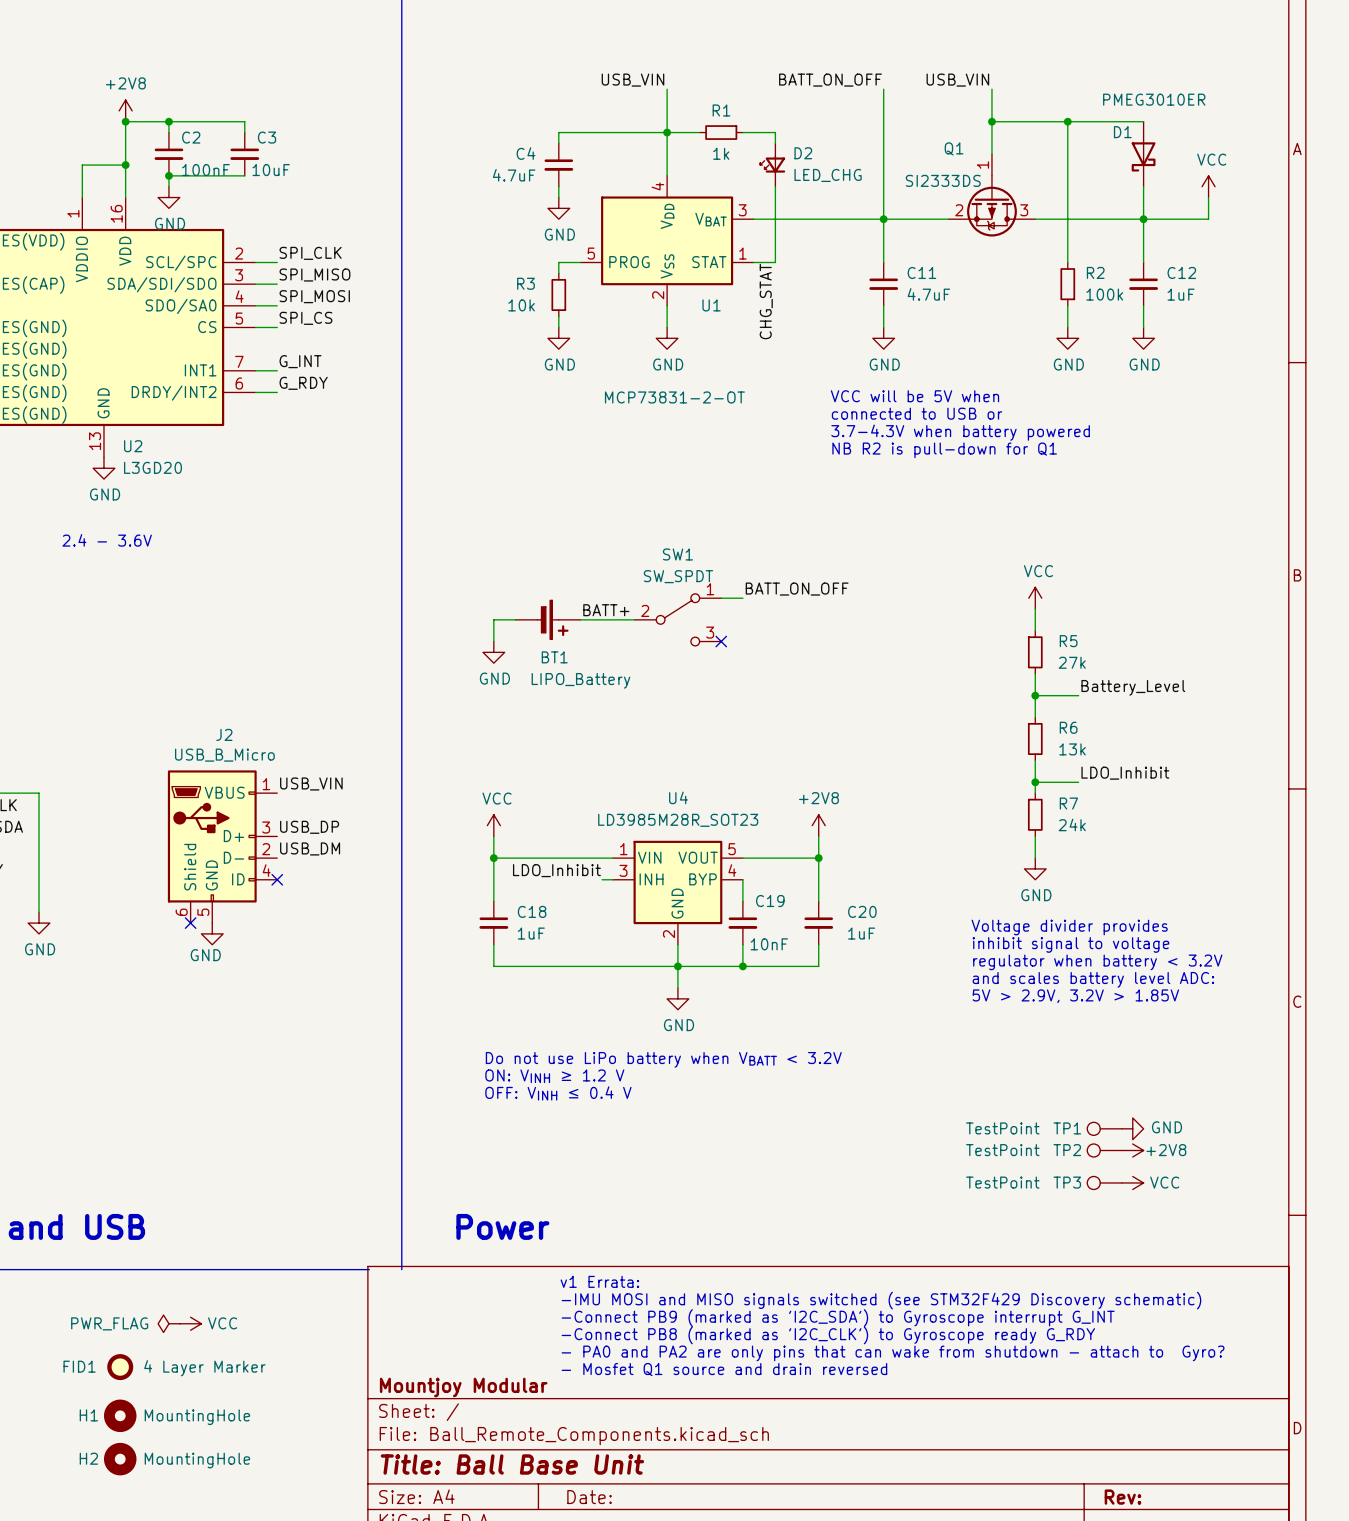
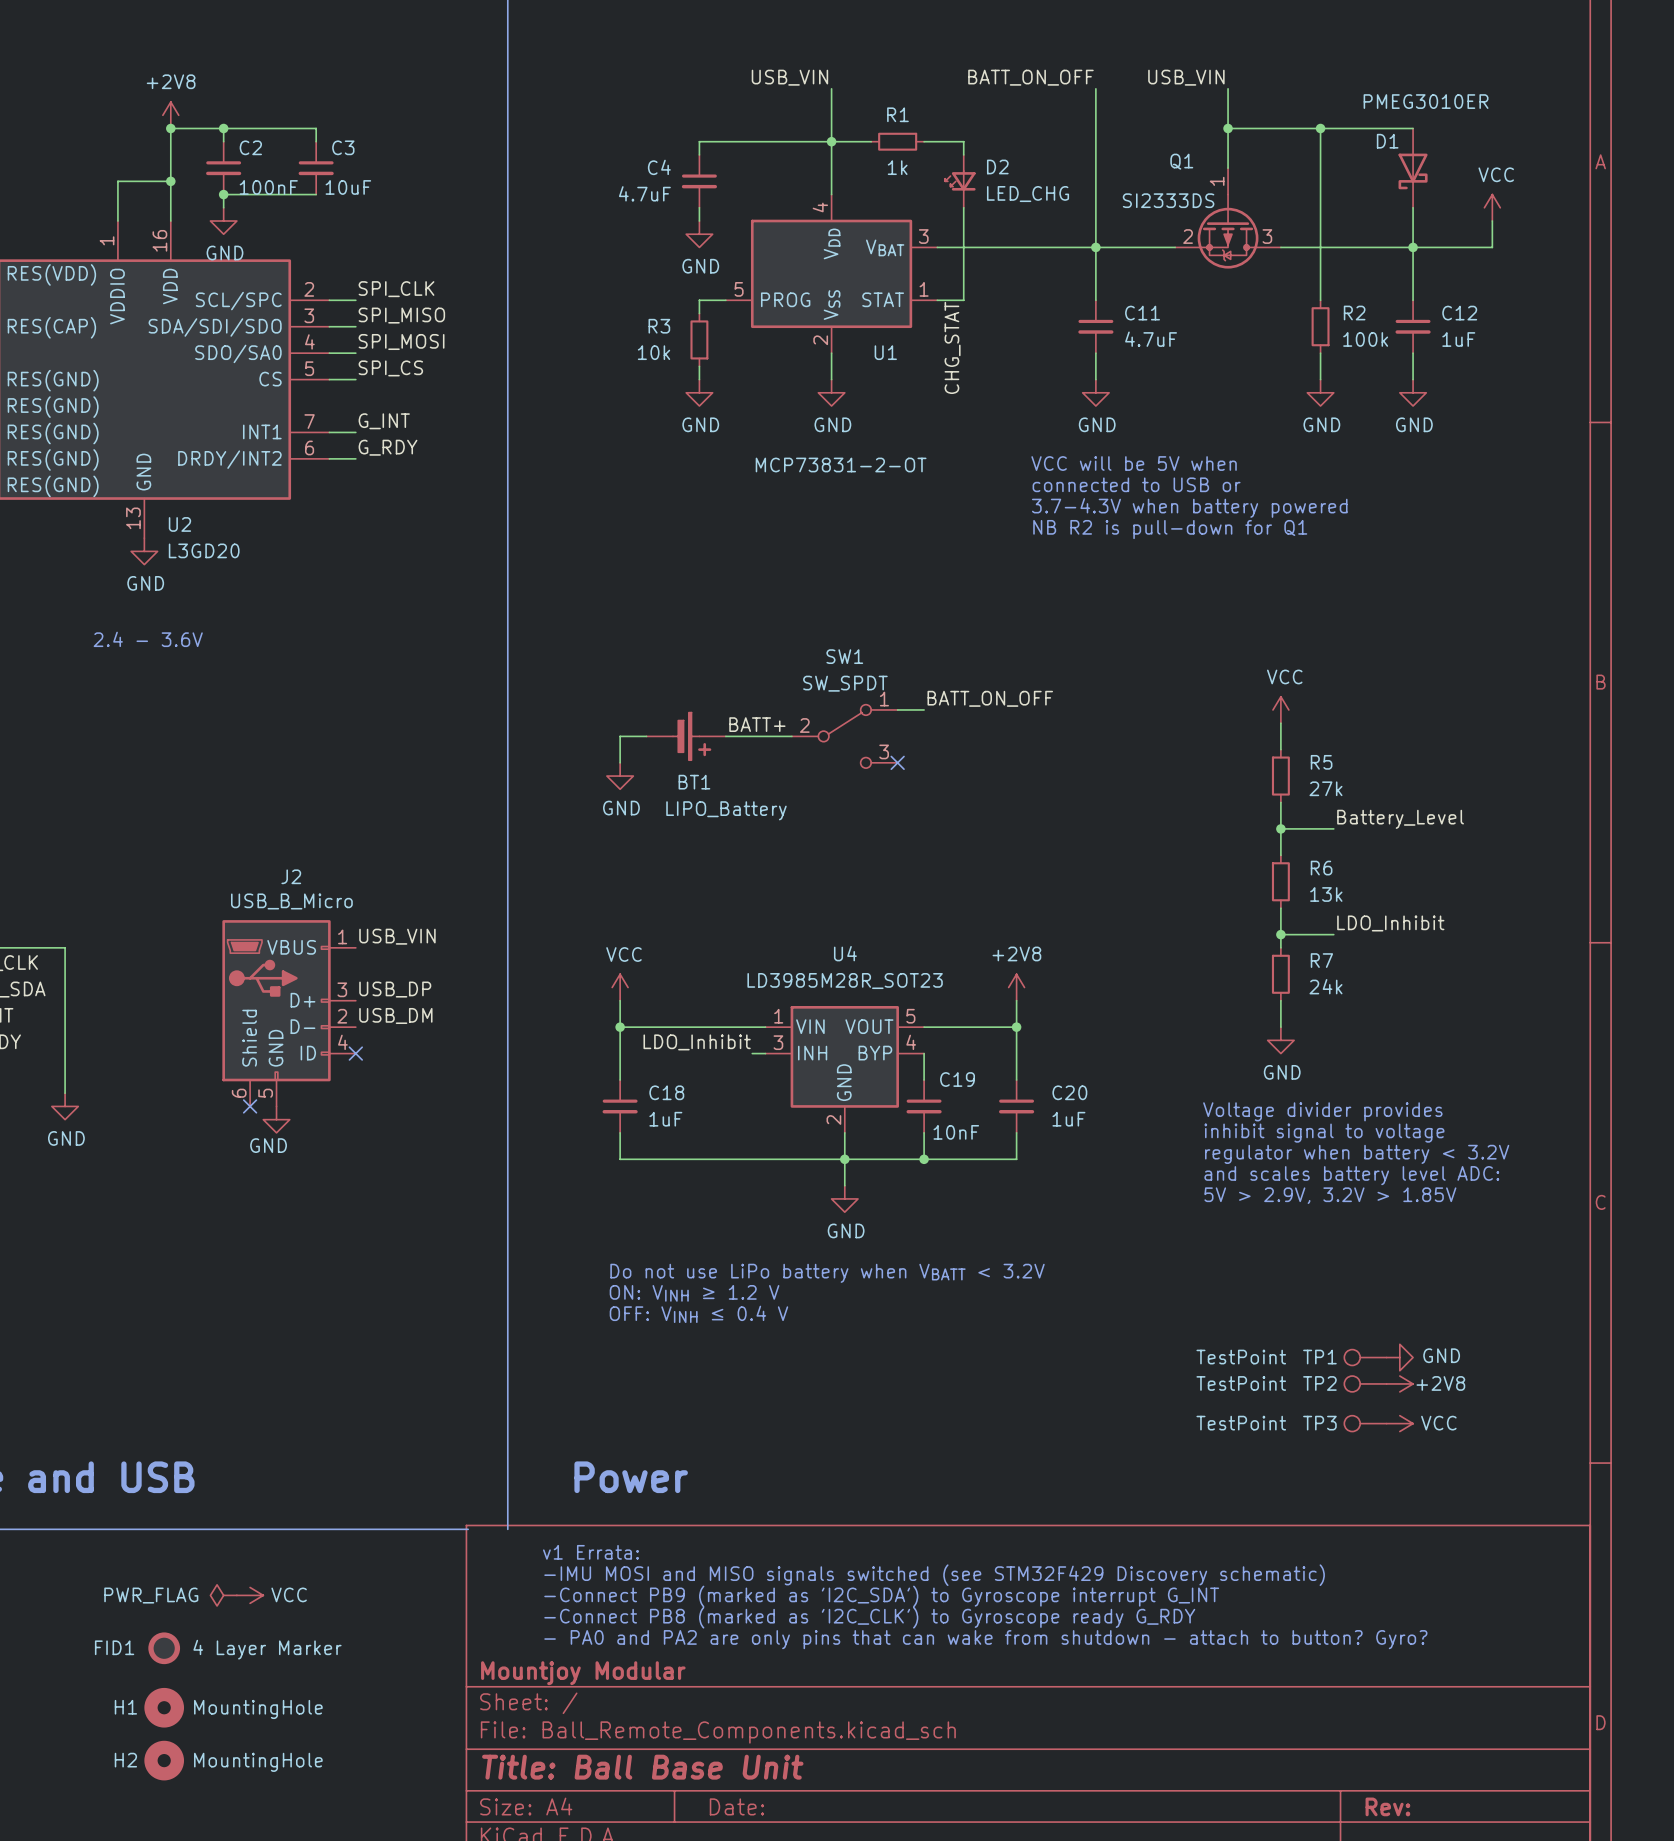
text position: v1 Errata: (599, 1281) -> v1 Errata: (590, 1552)
text position: -IMU MOSI and MISO signals switched (see STM32F429 Discovery schematic) (881, 1300) -> -IMU MOSI and MISO signals switched (see STM32F429 Discovery schematic) (934, 1575)
text position: -Connect PB9 (marked as 'I2C_SDA') to Gyroscope interrupt G_INT (838, 1318) -> -Connect PB9 (marked as 'I2C_SDA') to Gyroscope interrupt G_INT (881, 1596)
text position: -Connect PB8 (marked as 'I2C_CLK') to Gyroscope ready G_RDY (828, 1335) -> -Connect PB8 (marked as 'I2C_CLK') to Gyroscope ready G_RDY (869, 1617)
text: - PA0 and PA2 are only pins that can wake from shutdown - attach to Gyro? (893, 1353) -> - PA0 and PA2 are only pins that can wake from shutdown - attach to button? Gyro? (985, 1639)
text: - Mosfet Q1 source and drain reversed (724, 1369) -> none

